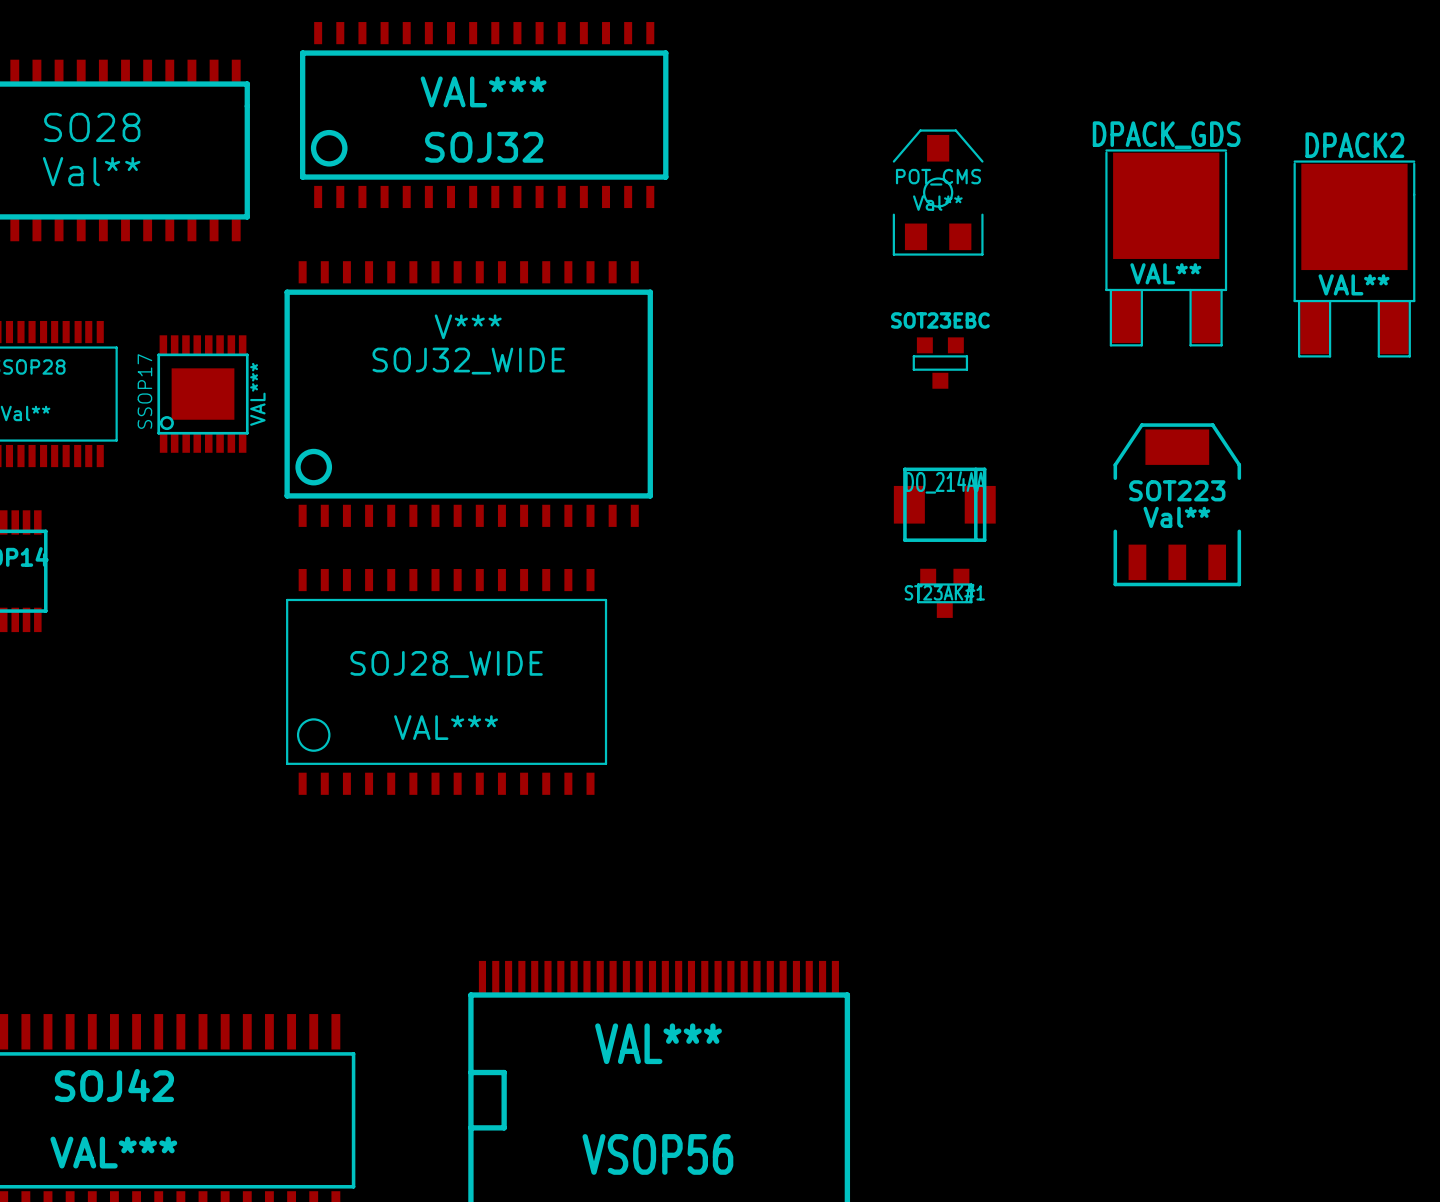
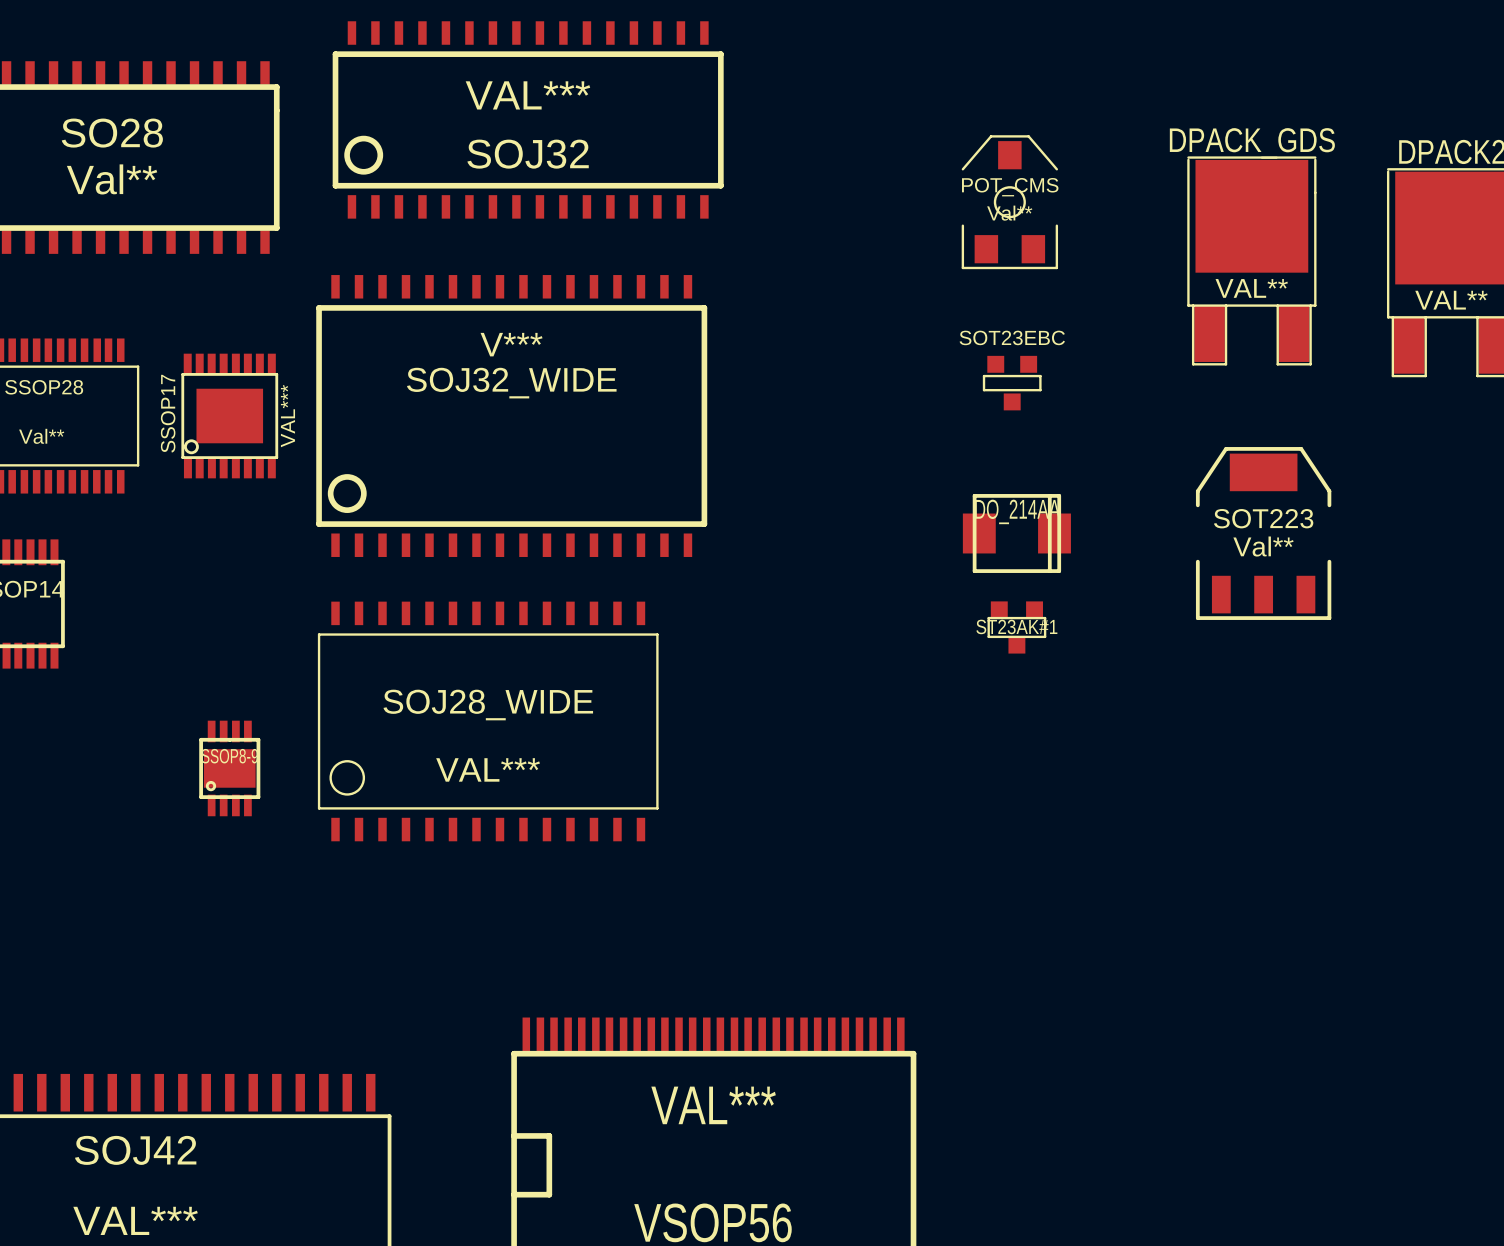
SSOP8-9: none -> (229, 768)

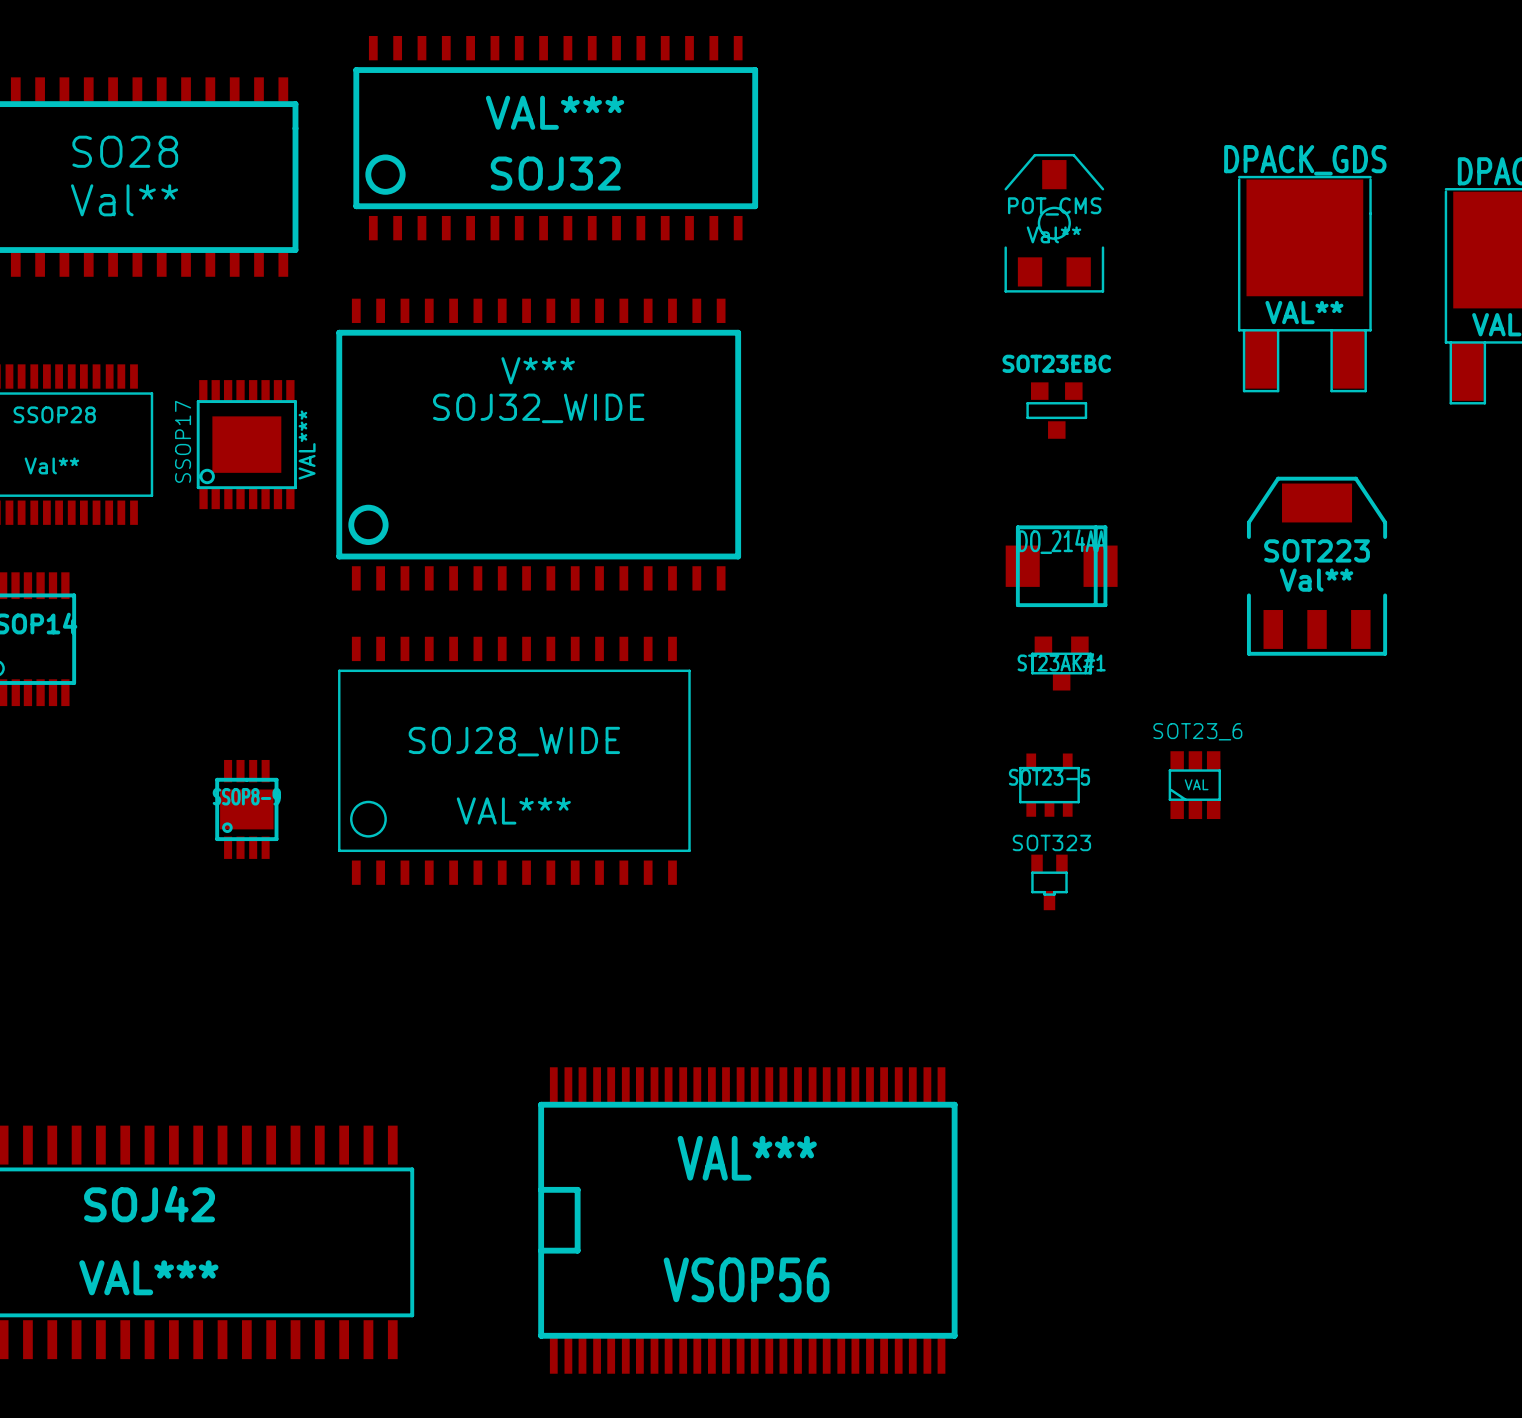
SOT23-5: none -> (1049, 785)
SOT23_6: none -> VAL (1194, 785)
SOT323: none -> (1049, 882)

